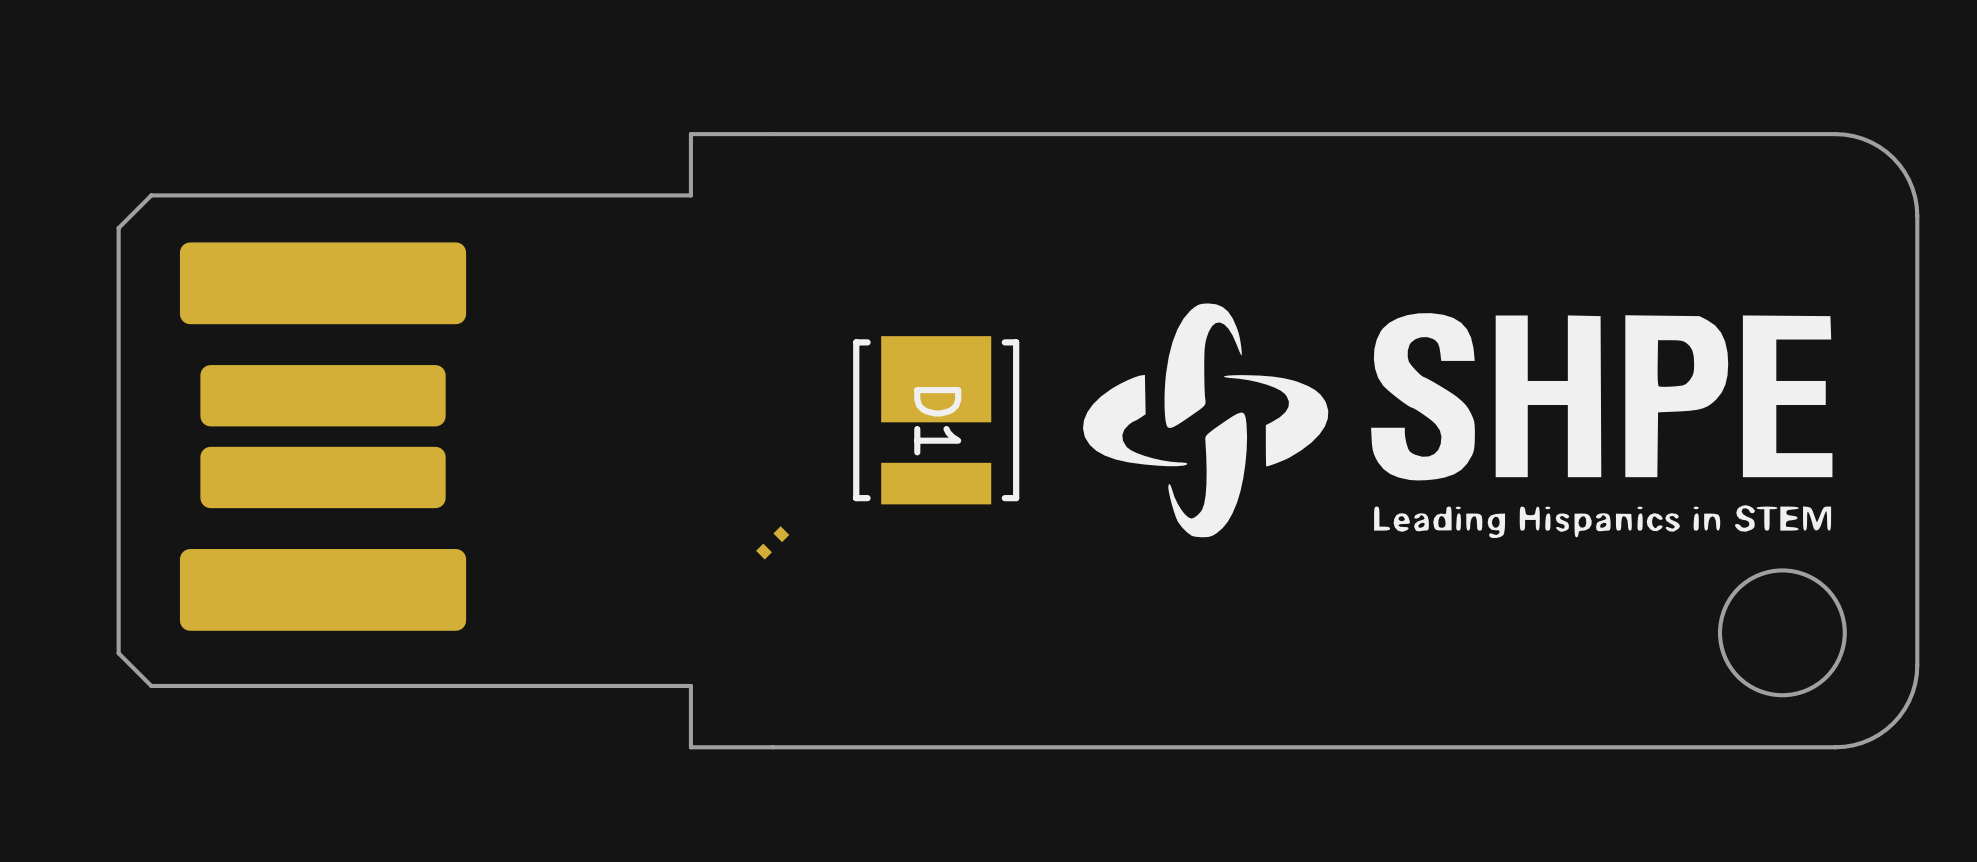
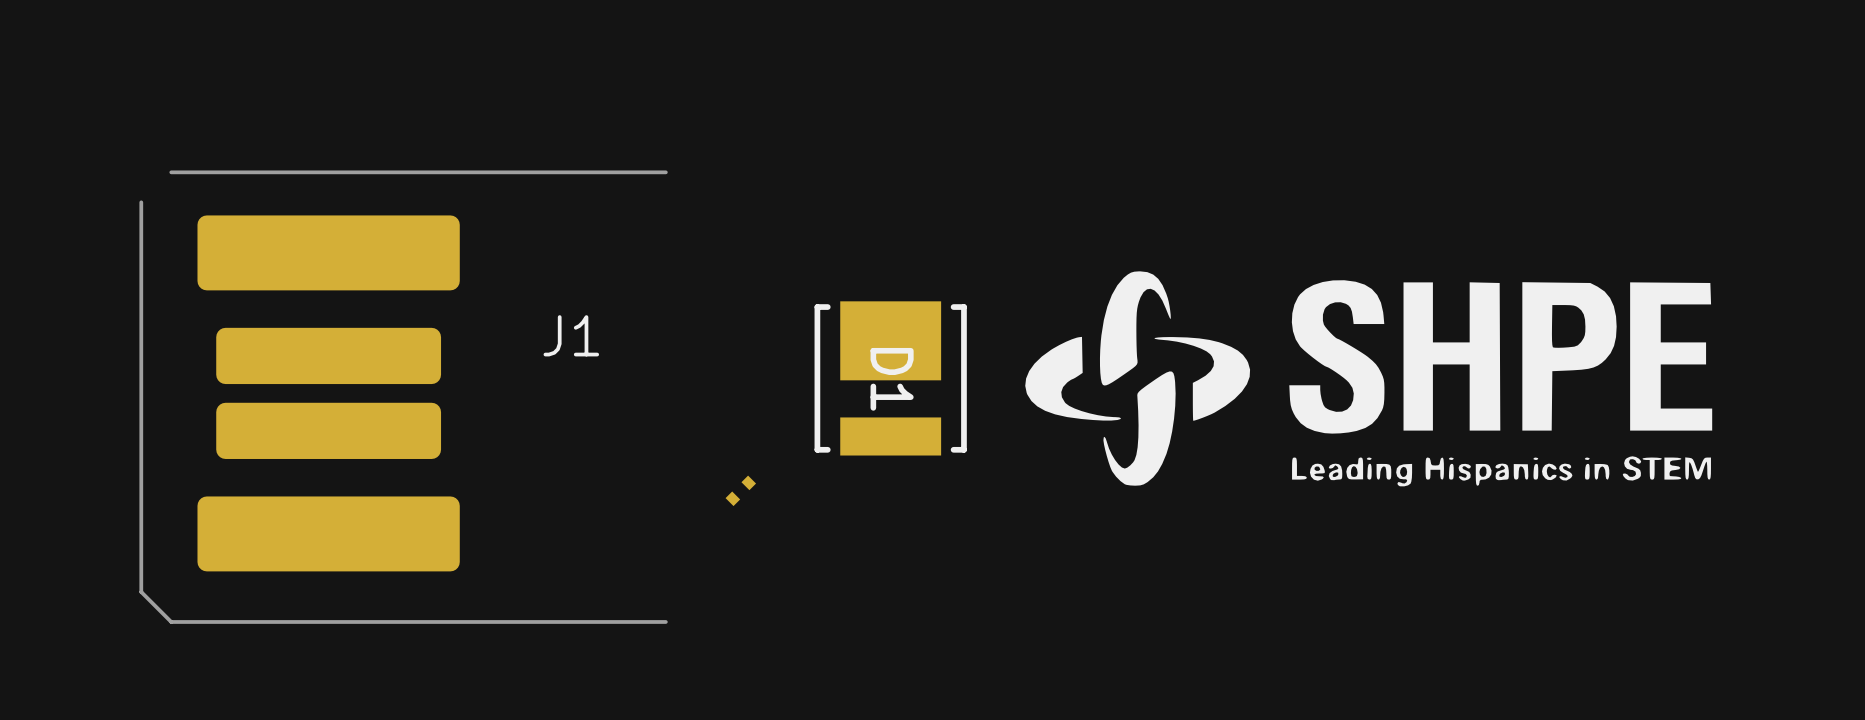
board edge: (151, 195) (118, 228) -> none
board edge: (690, 195) (690, 134) (1835, 134) (1853, 136) (1871, 142) (1893, 158) (1904, 172) (1912, 188) (1917, 215) (1916, 674) (1909, 701) (1899, 716) (1886, 729) (1862, 742) (1835, 747) (690, 747) (690, 685) -> none
J1 name: none -> J1 (571, 335)
round board edge: [1717, 568, 1847, 698] -> none

